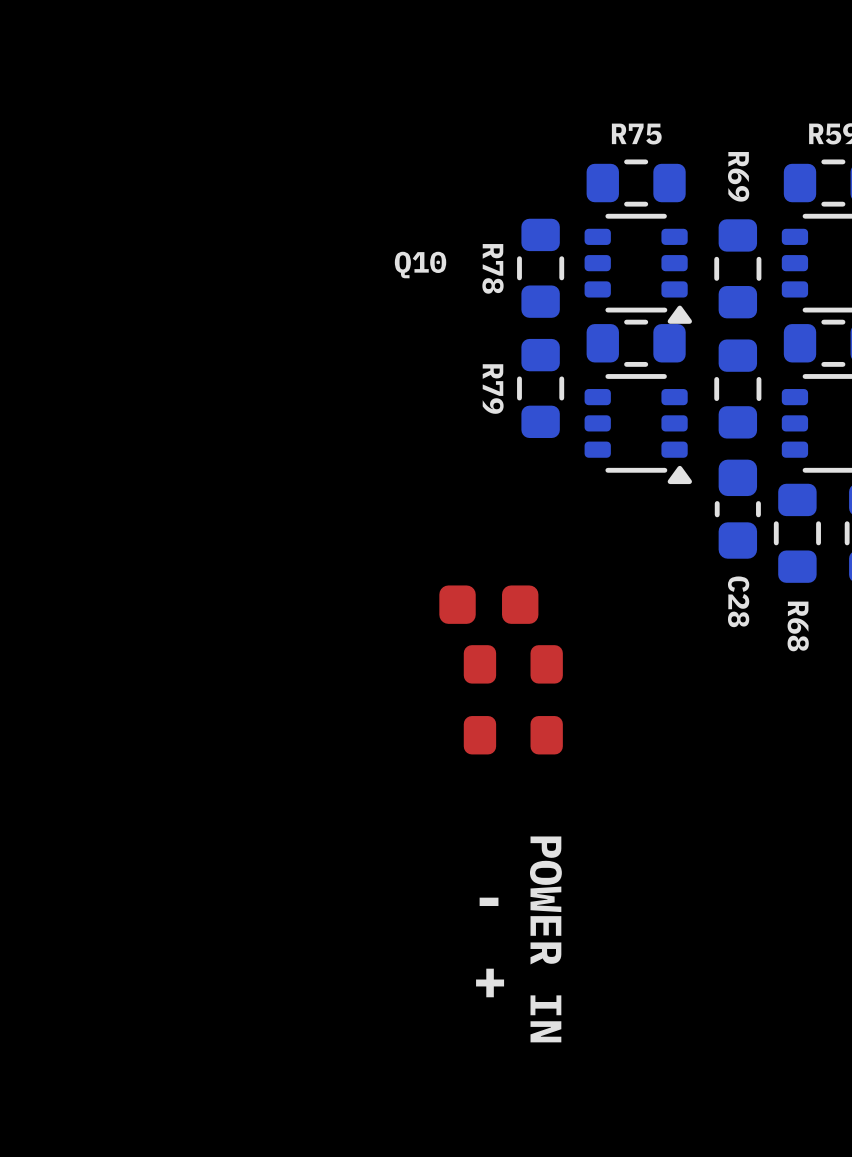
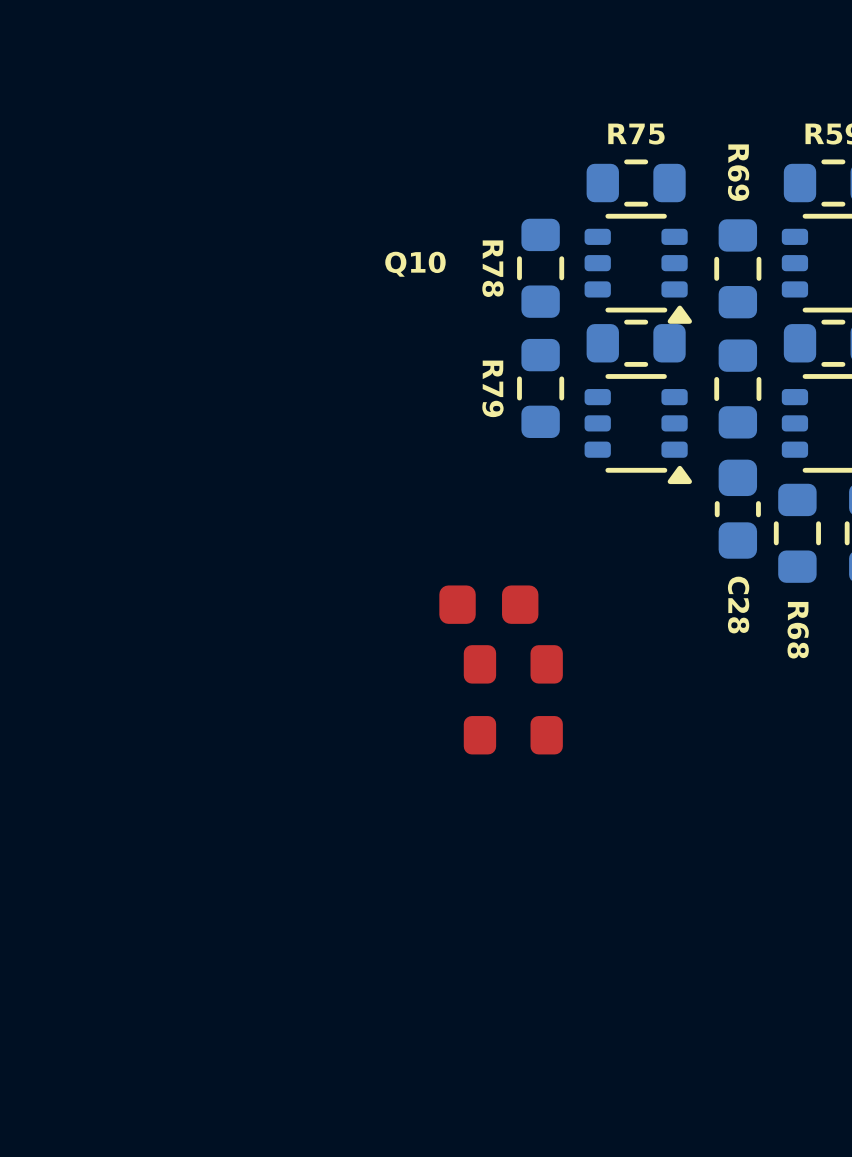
text: - (489, 901) -> none
text: POWER IN (545, 939) -> none
text: + (490, 982) -> none

